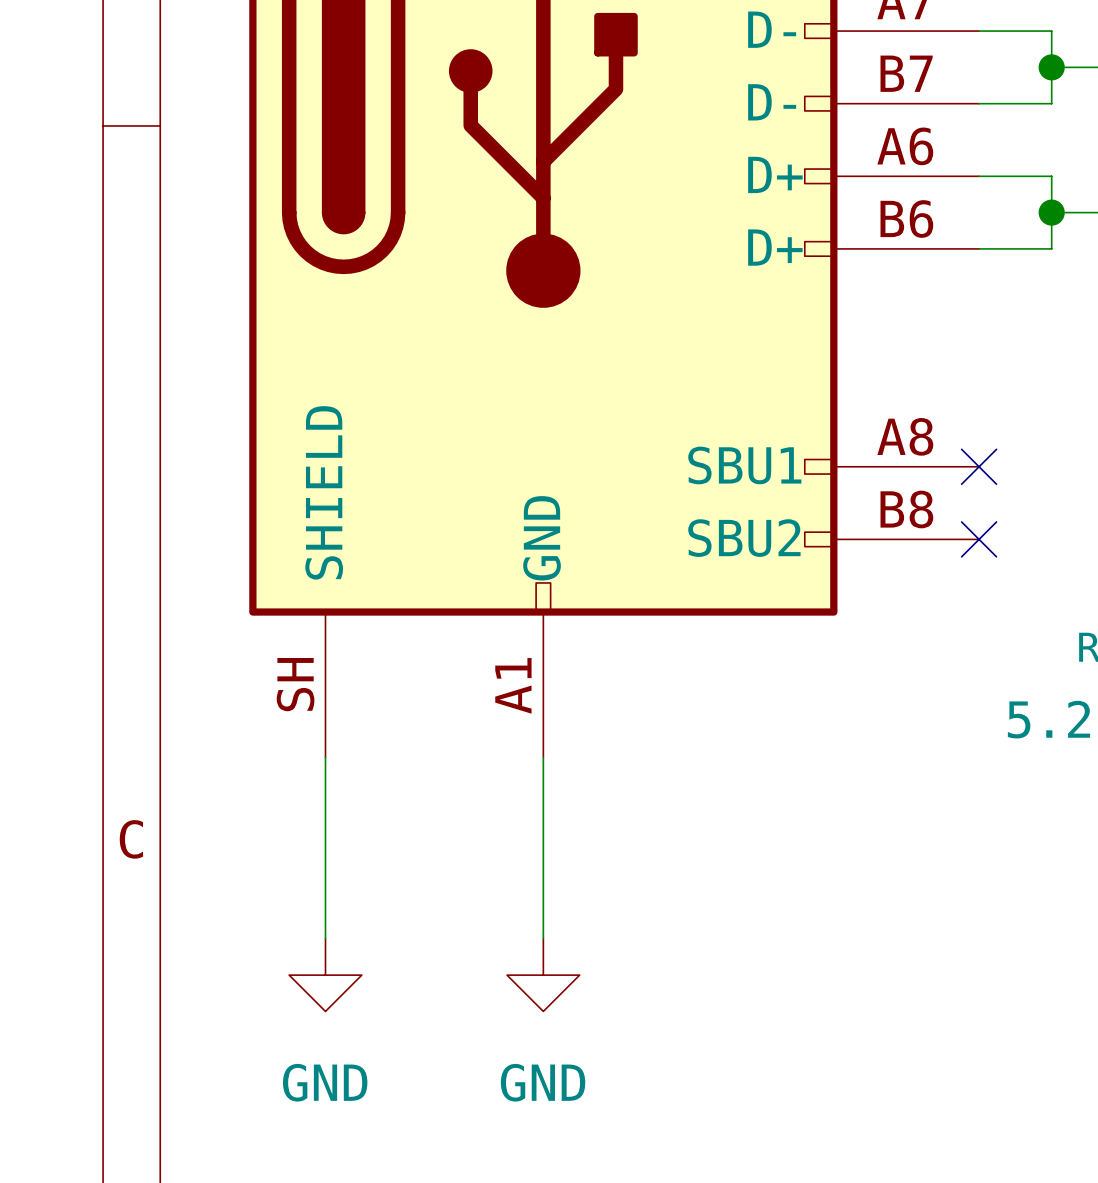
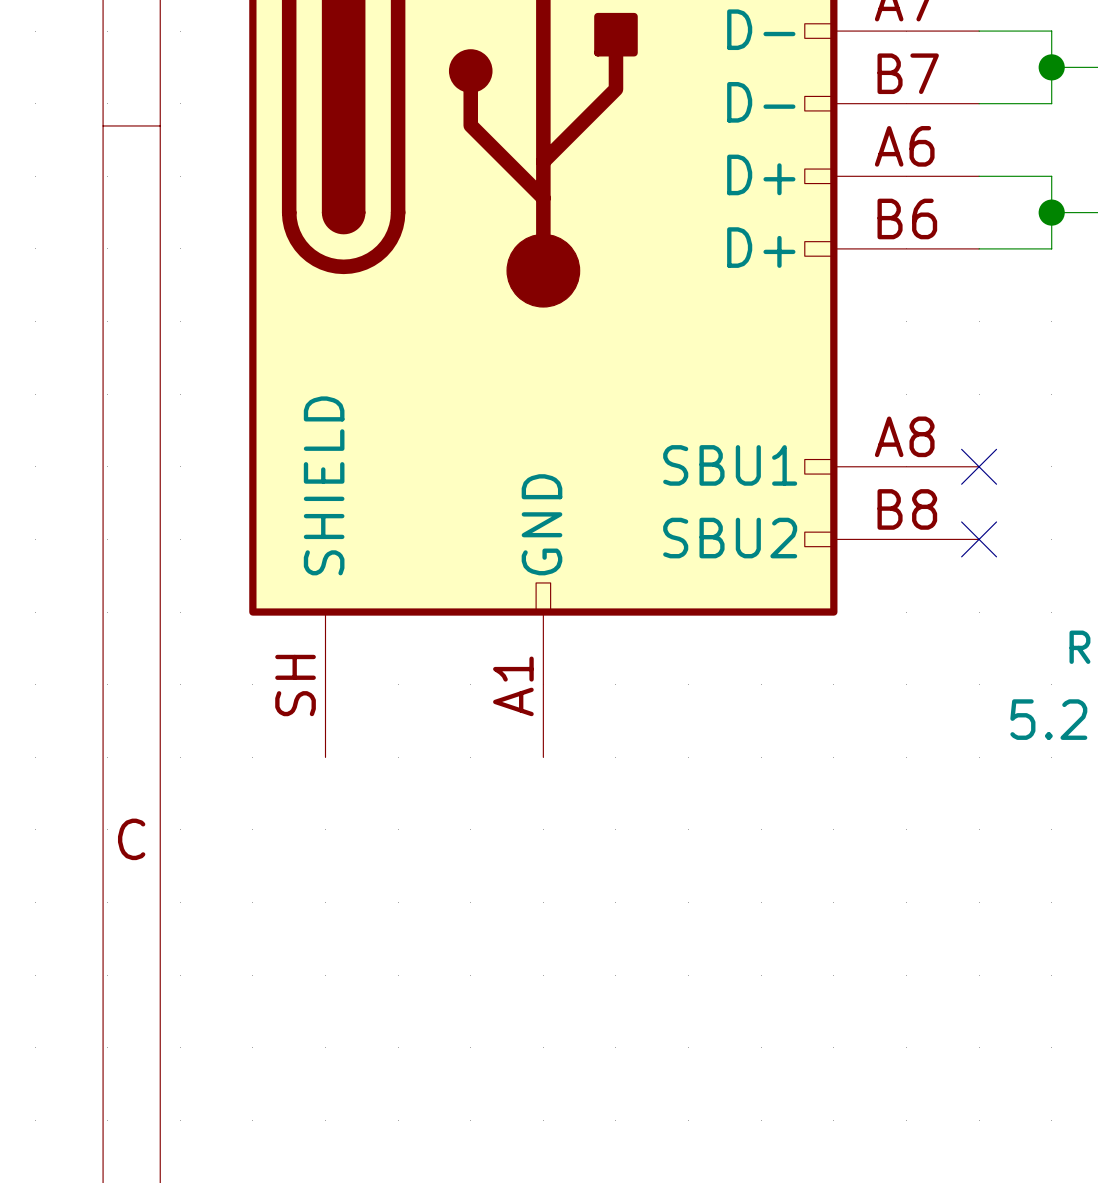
wire: (325, 757) (325, 938) -> none
wire: (543, 757) (543, 938) -> none
power symbol: GND (325, 975) -> none
power symbol: GND (543, 975) -> none

